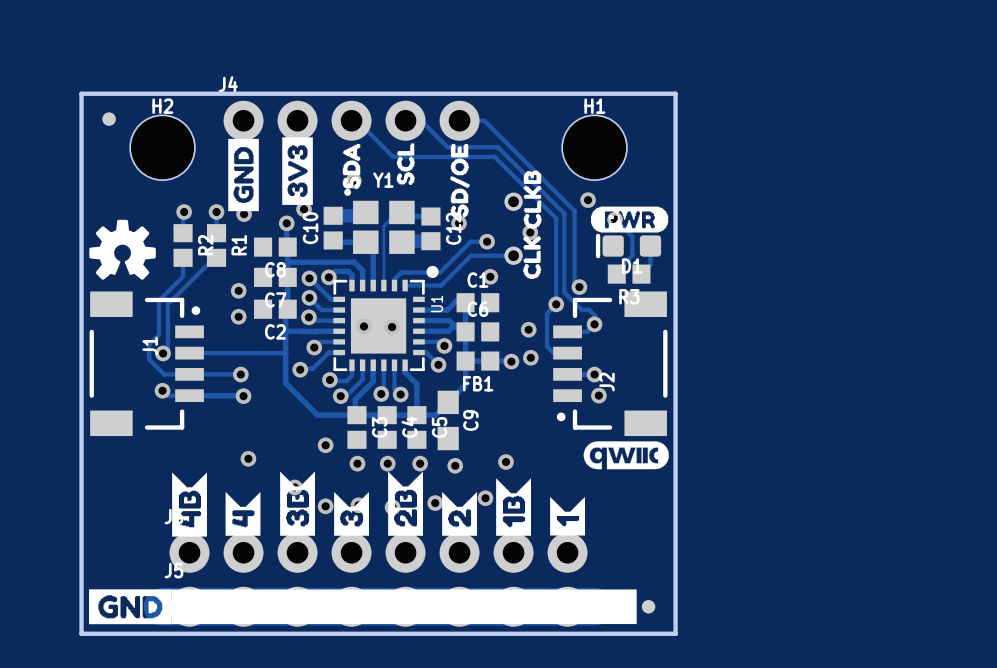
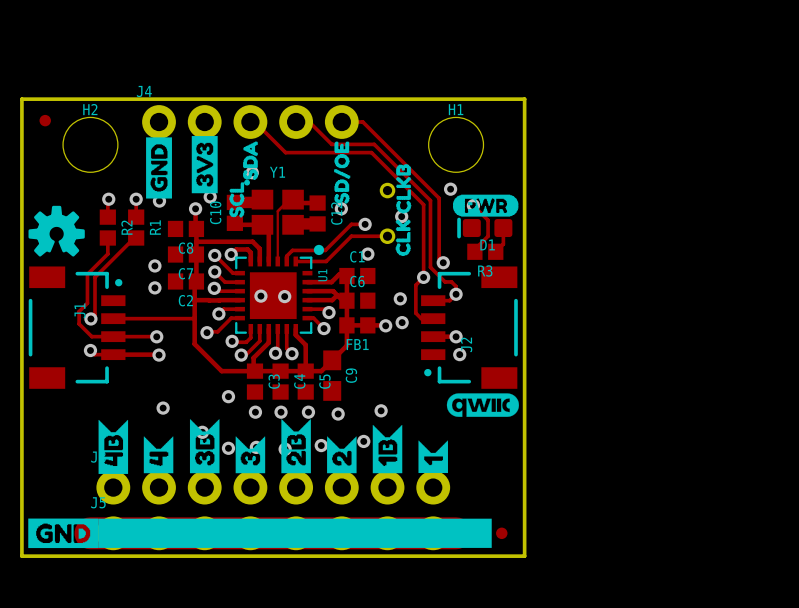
drawing position: (405, 164) -> (236, 199)

